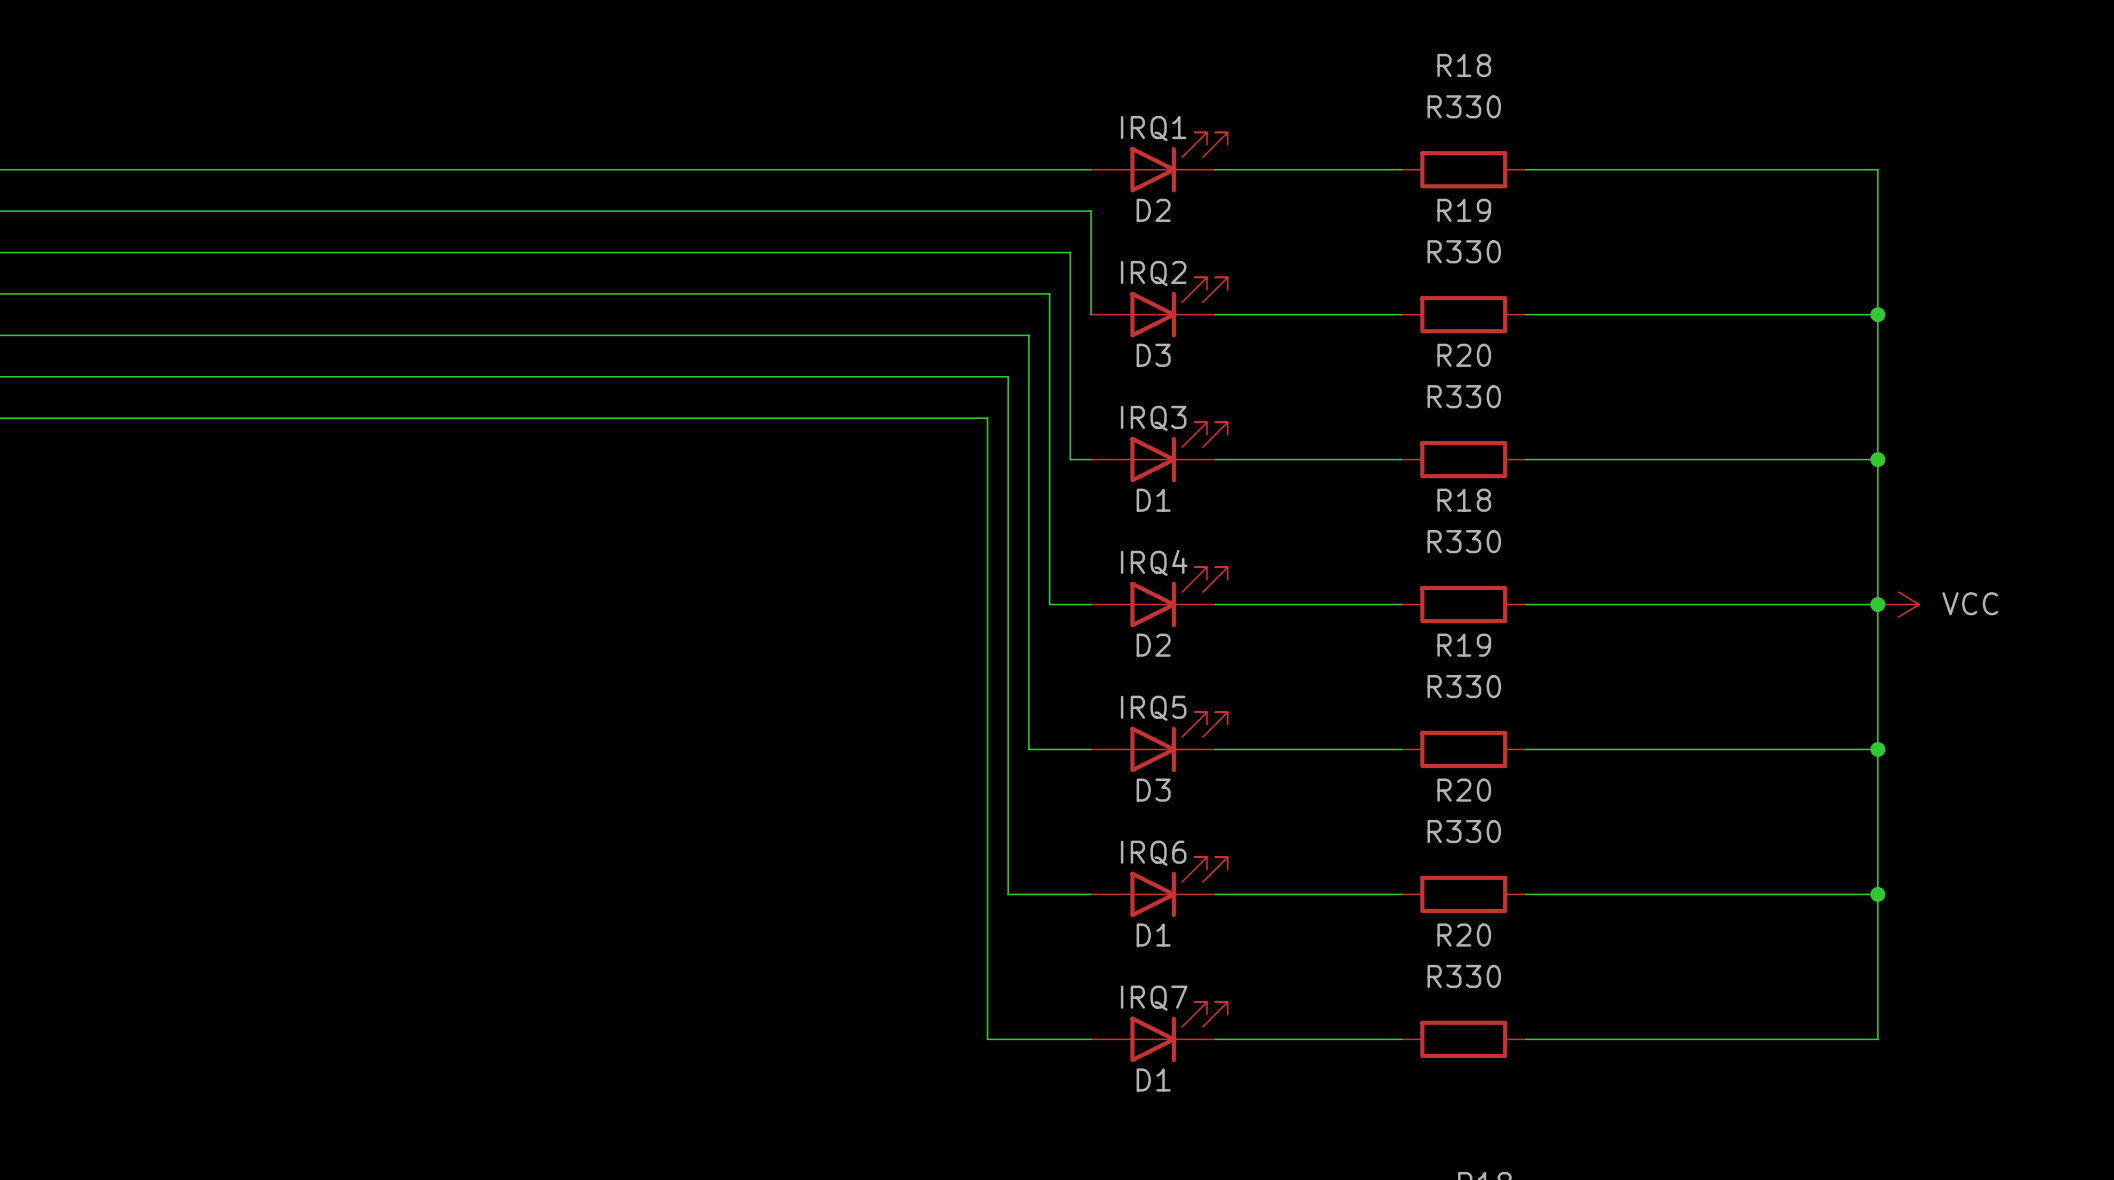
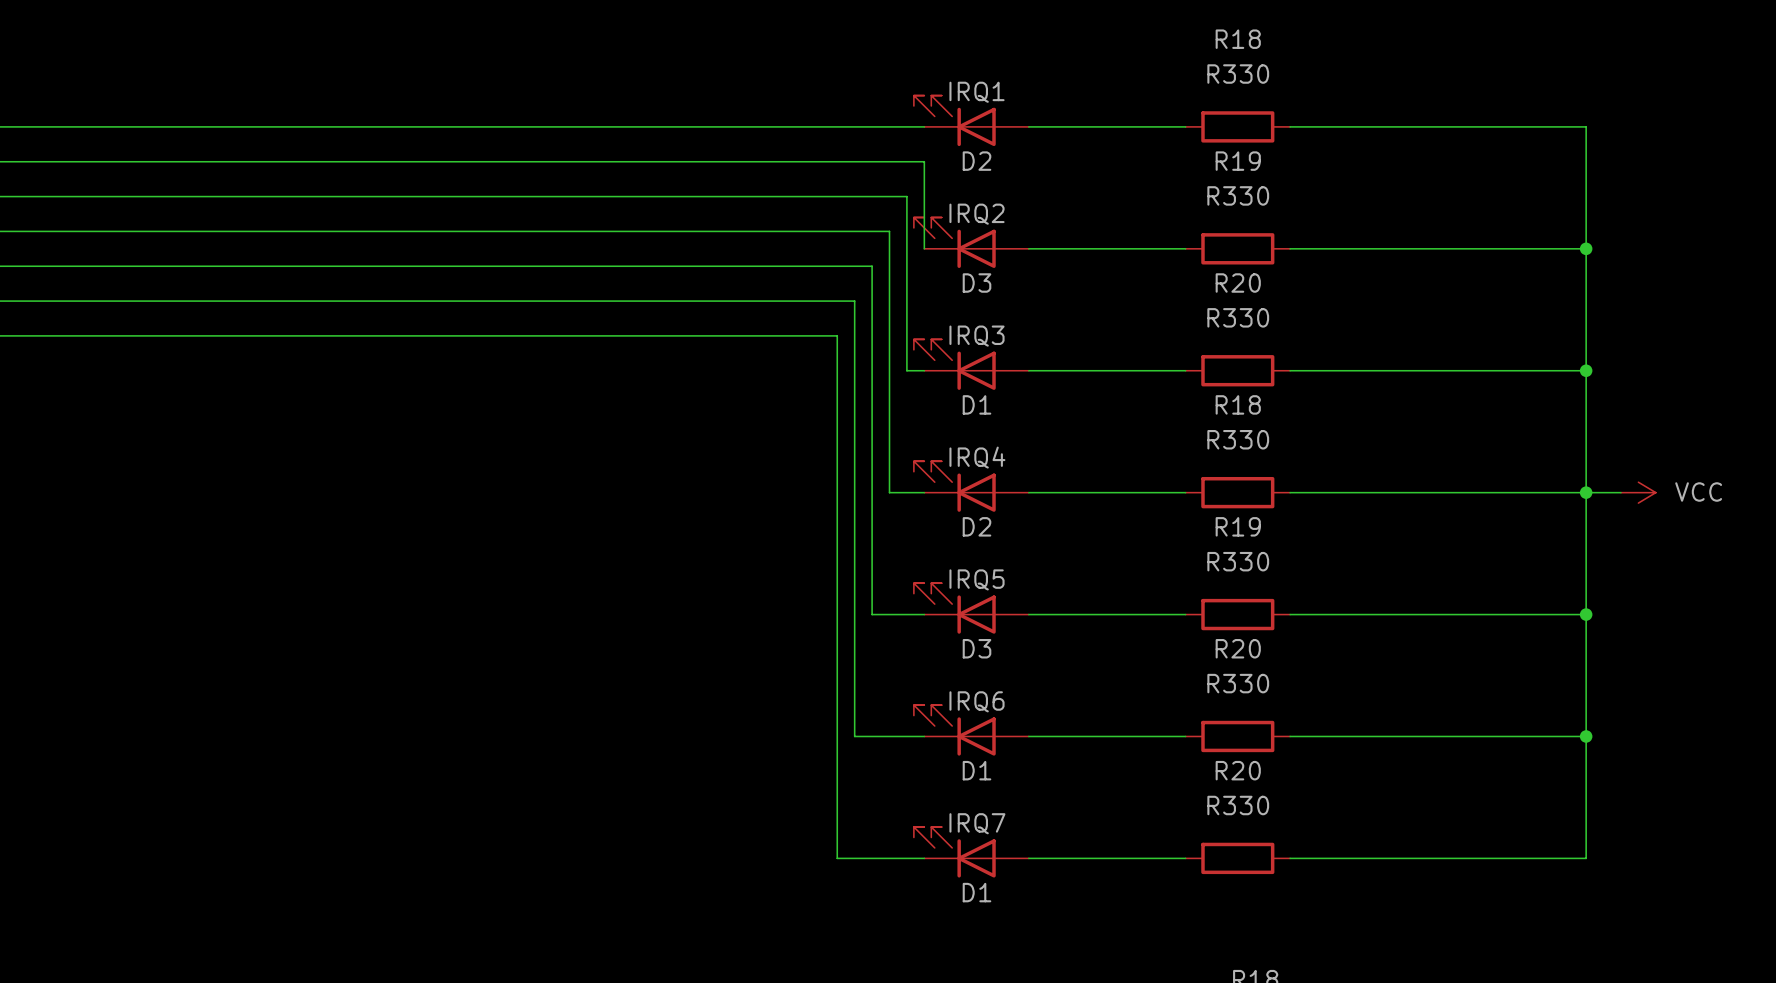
D2 flip: as is (1179, 162) -> left-right (954, 120)
D3 flip: as is (1179, 307) -> left-right (954, 242)
D1 flip: as is (1179, 452) -> left-right (954, 364)
D2 flip: as is (1179, 597) -> left-right (954, 486)
power symbol position: VCC (1898, 604) -> VCC (1638, 492)
D3 flip: as is (1179, 742) -> left-right (954, 608)
D1 flip: as is (1179, 887) -> left-right (954, 730)
D1 flip: as is (1179, 1032) -> left-right (954, 852)

